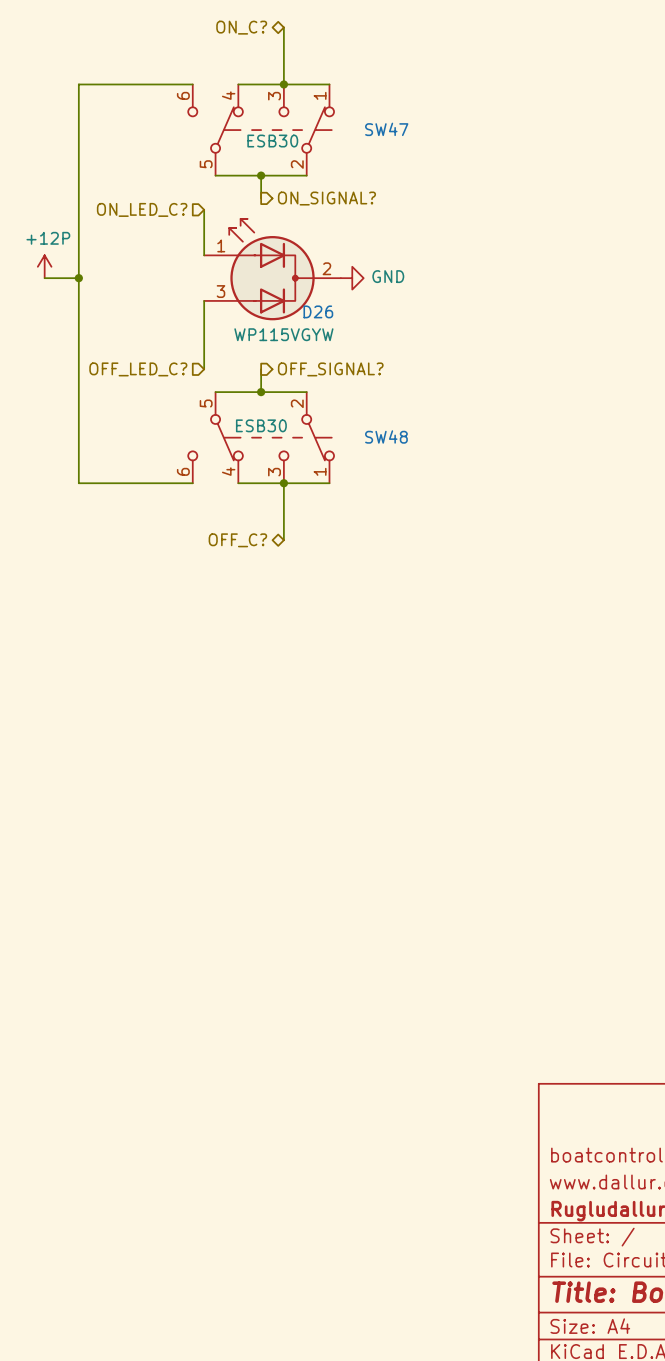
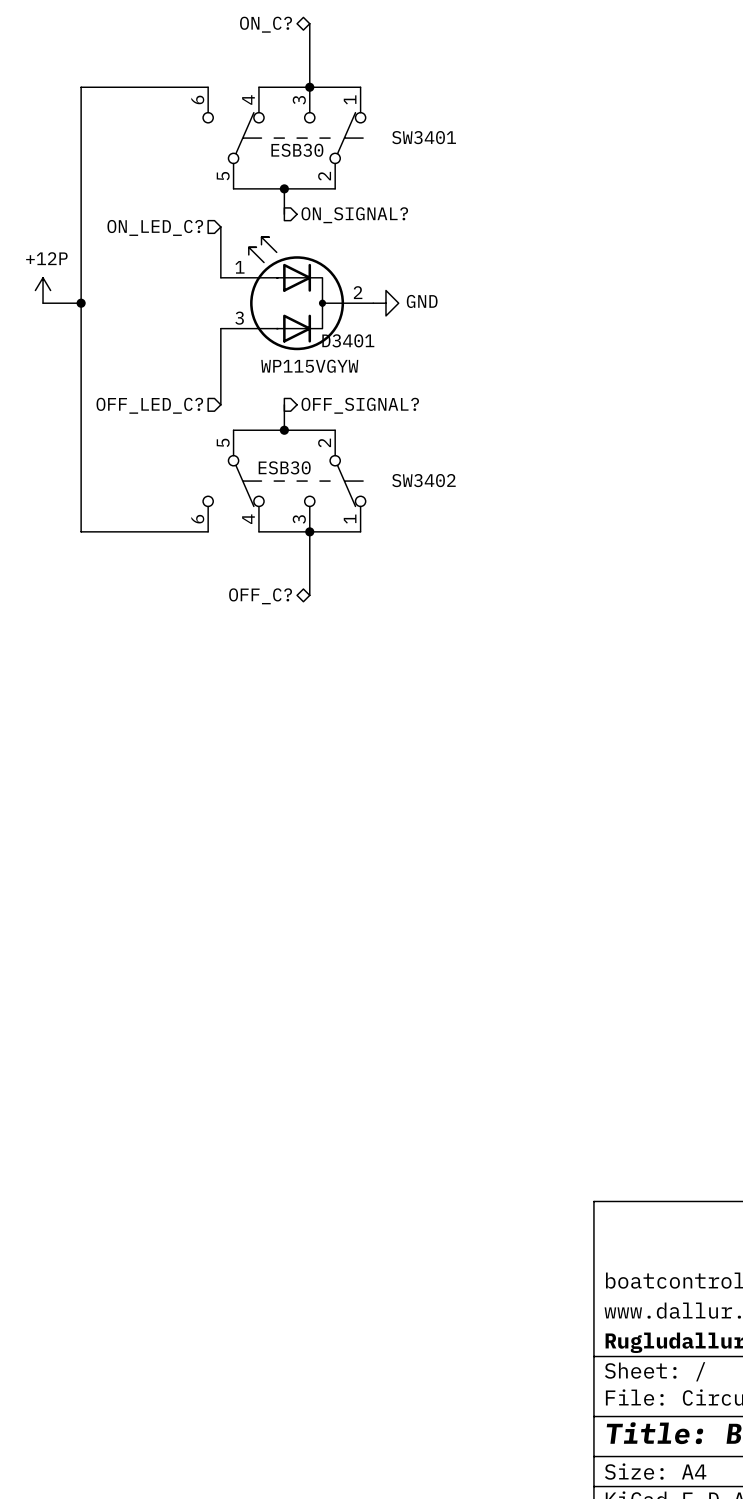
SW47 name: SW47 (386, 129) -> SW3401 (424, 137)
D26 name: D26 (318, 311) -> D3401 (348, 340)
SW48 name: SW48 (386, 436) -> SW3402 (423, 480)

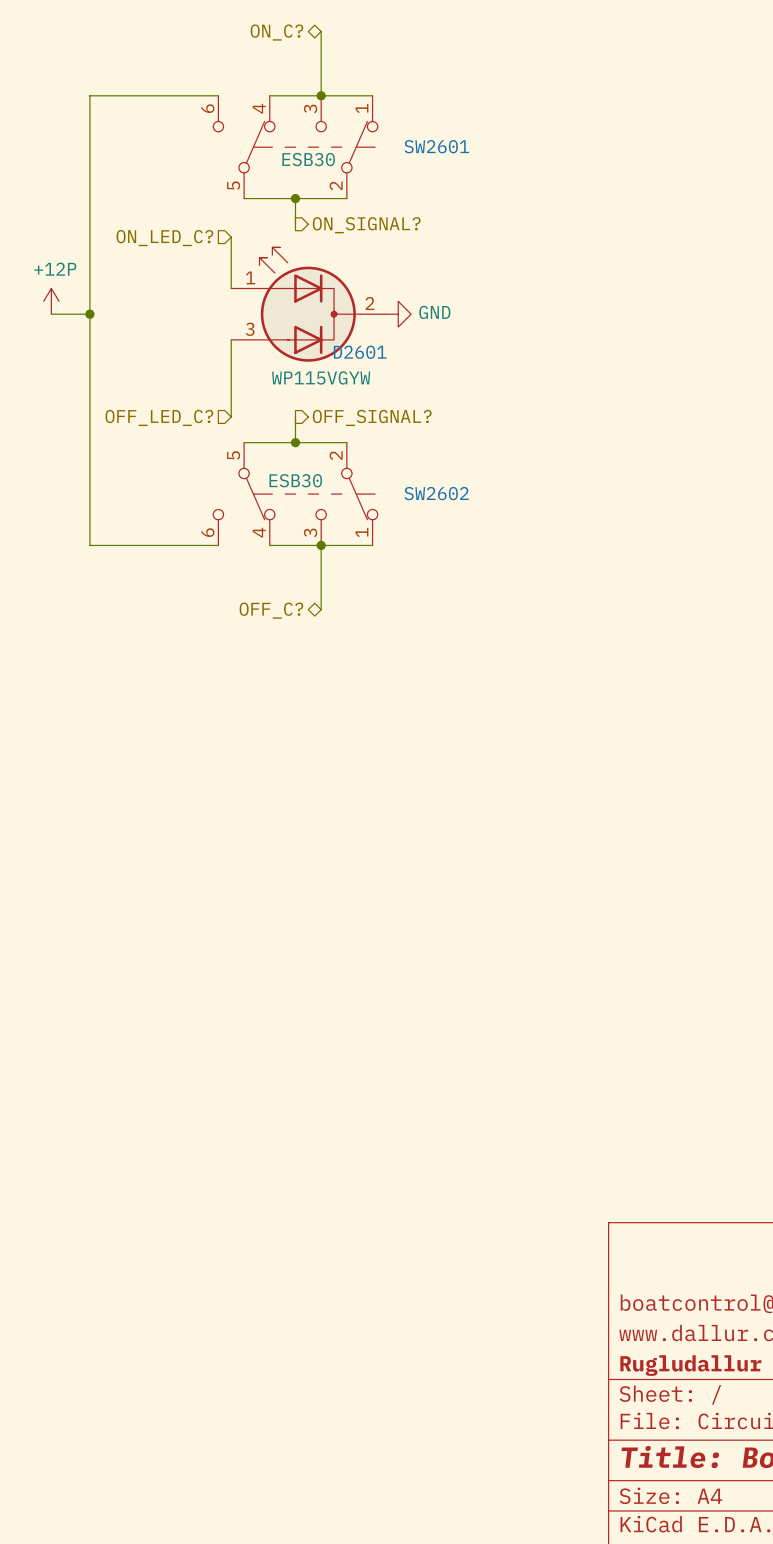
SW3401 name: SW3401 (424, 137) -> SW2601 (436, 146)
D3401 name: D3401 (348, 340) -> D2601 (360, 352)
SW3402 name: SW3402 (423, 480) -> SW2602 (436, 493)

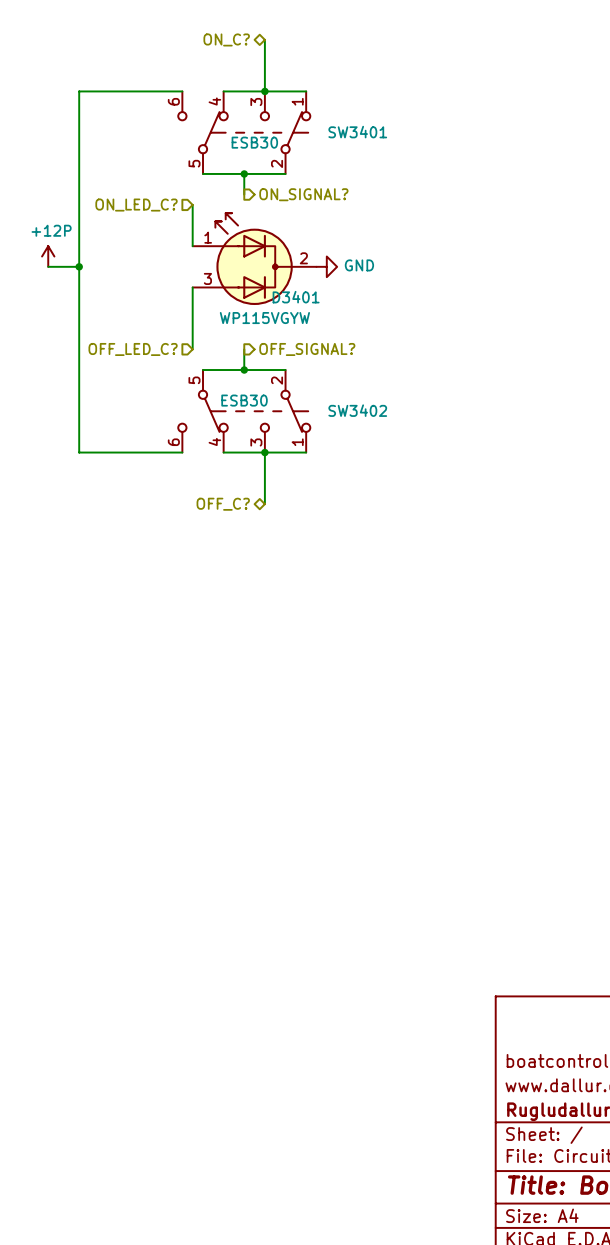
SW2601 name: SW2601 (436, 146) -> SW3401 (357, 132)
D2601 name: D2601 (360, 352) -> D3401 (296, 297)
SW2602 name: SW2602 (436, 493) -> SW3402 (357, 410)

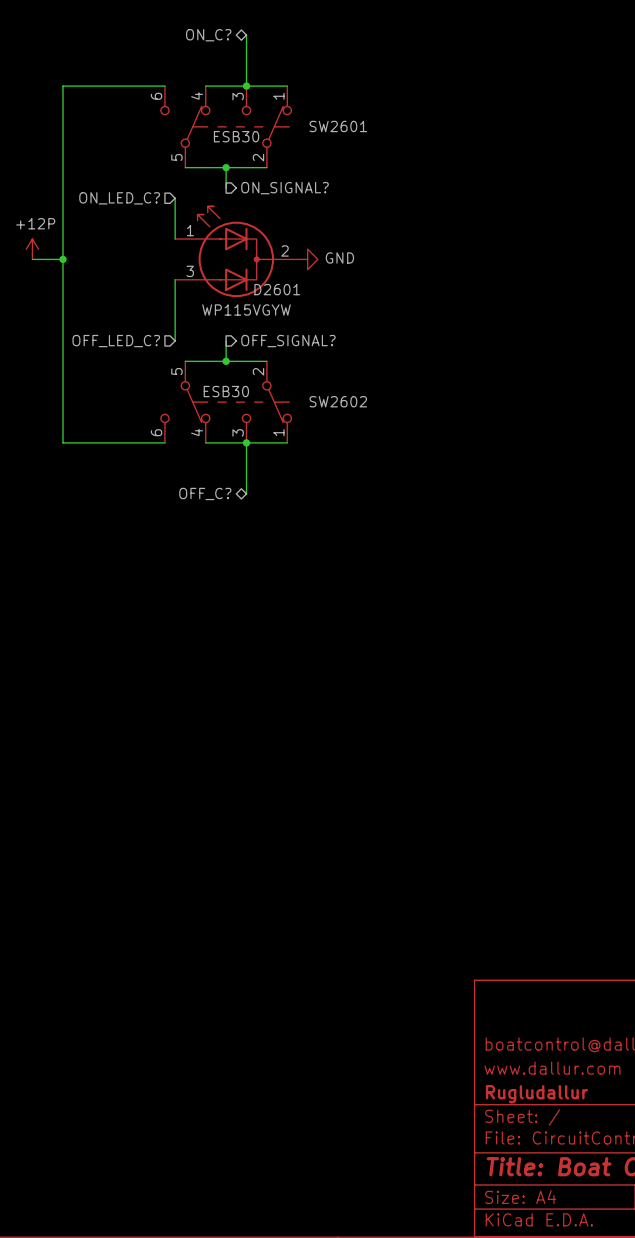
SW3401 name: SW3401 (357, 132) -> SW2601 (338, 126)
D3401 name: D3401 (296, 297) -> D2601 (277, 289)
SW3402 name: SW3402 (357, 410) -> SW2602 (338, 401)

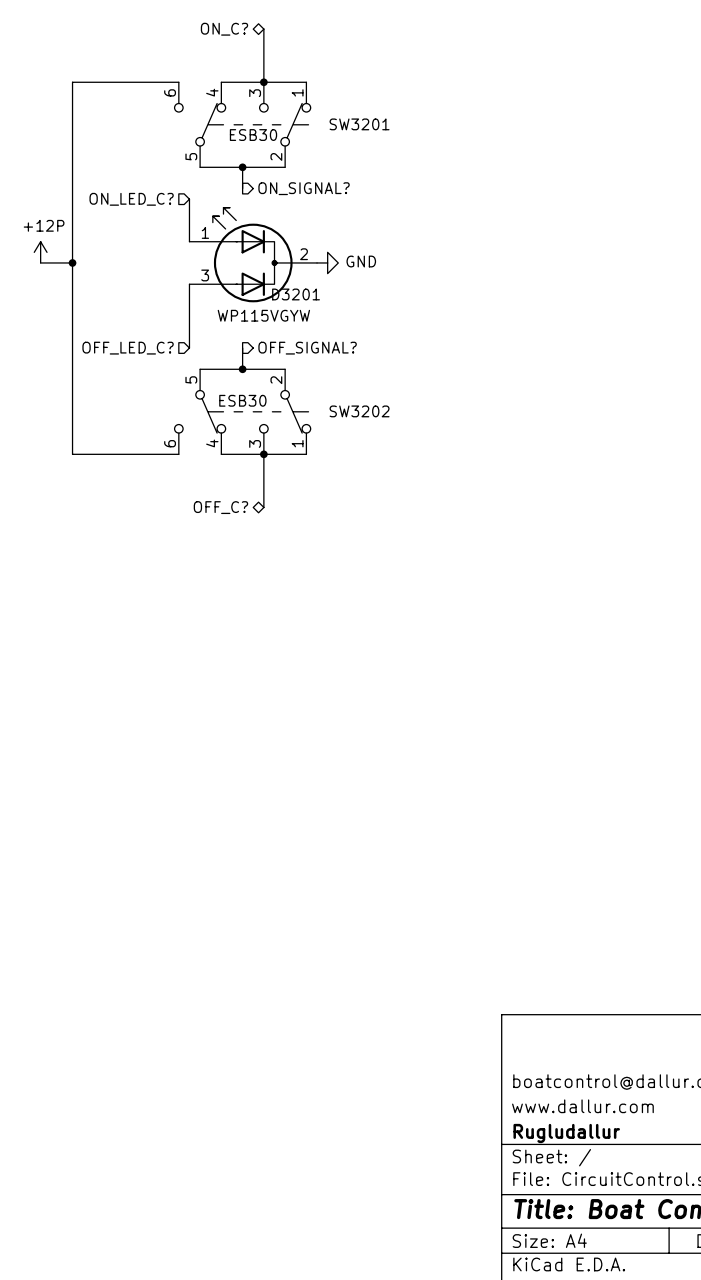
SW2601 name: SW2601 (338, 126) -> SW3201 (359, 124)
D2601 name: D2601 (277, 289) -> D3201 (296, 294)
SW2602 name: SW2602 (338, 401) -> SW3202 (359, 411)

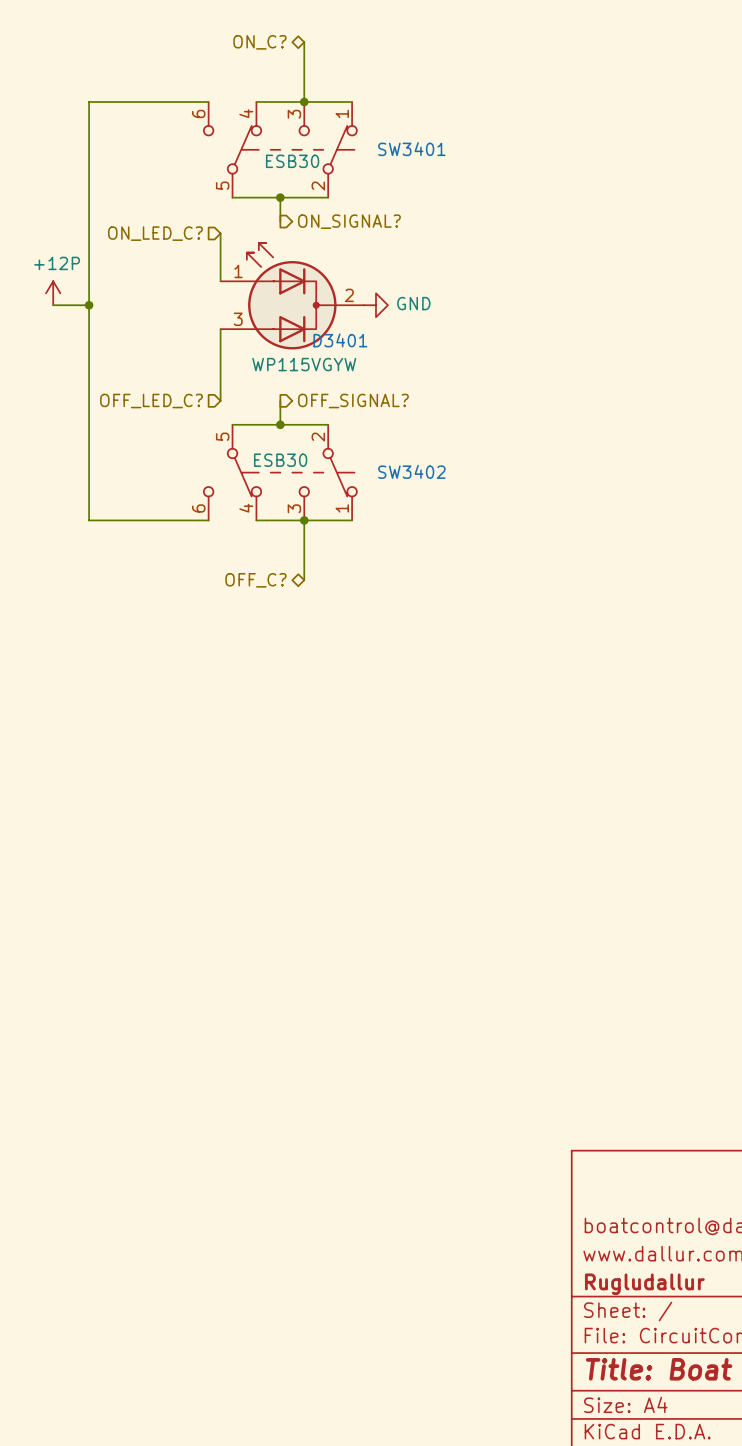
SW3201 name: SW3201 (359, 124) -> SW3401 (411, 149)
D3201 name: D3201 (296, 294) -> D3401 (340, 340)
SW3202 name: SW3202 (359, 411) -> SW3402 (411, 471)

